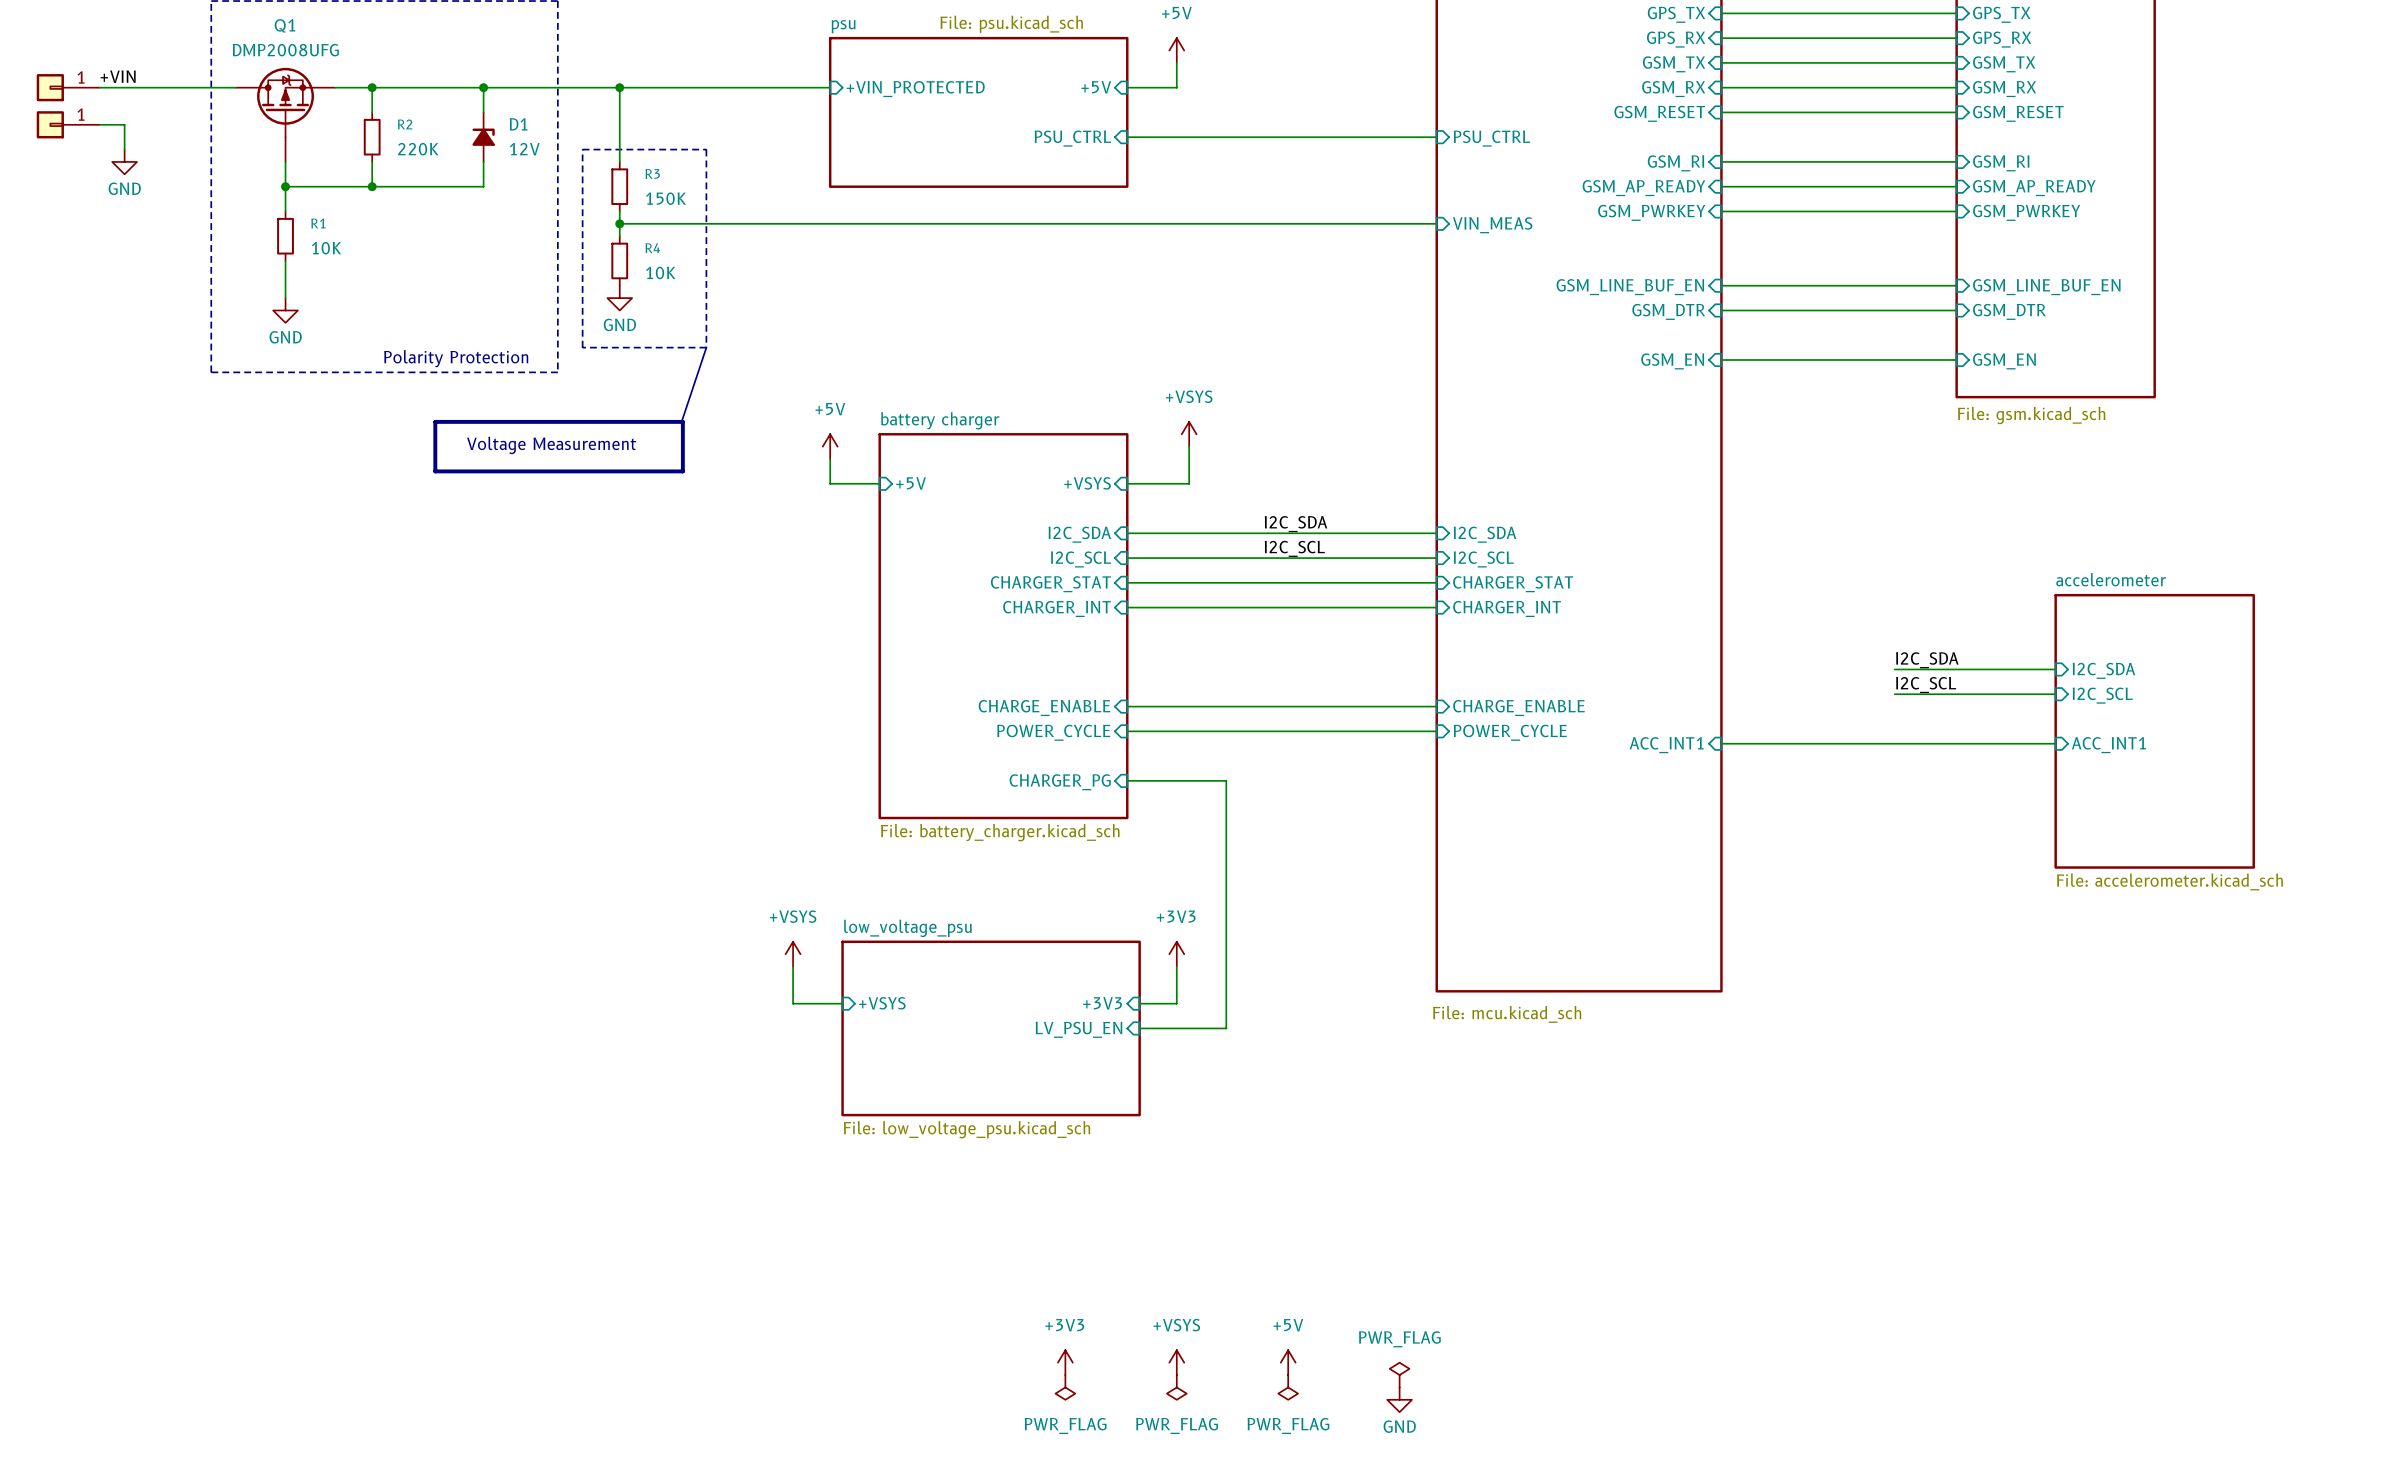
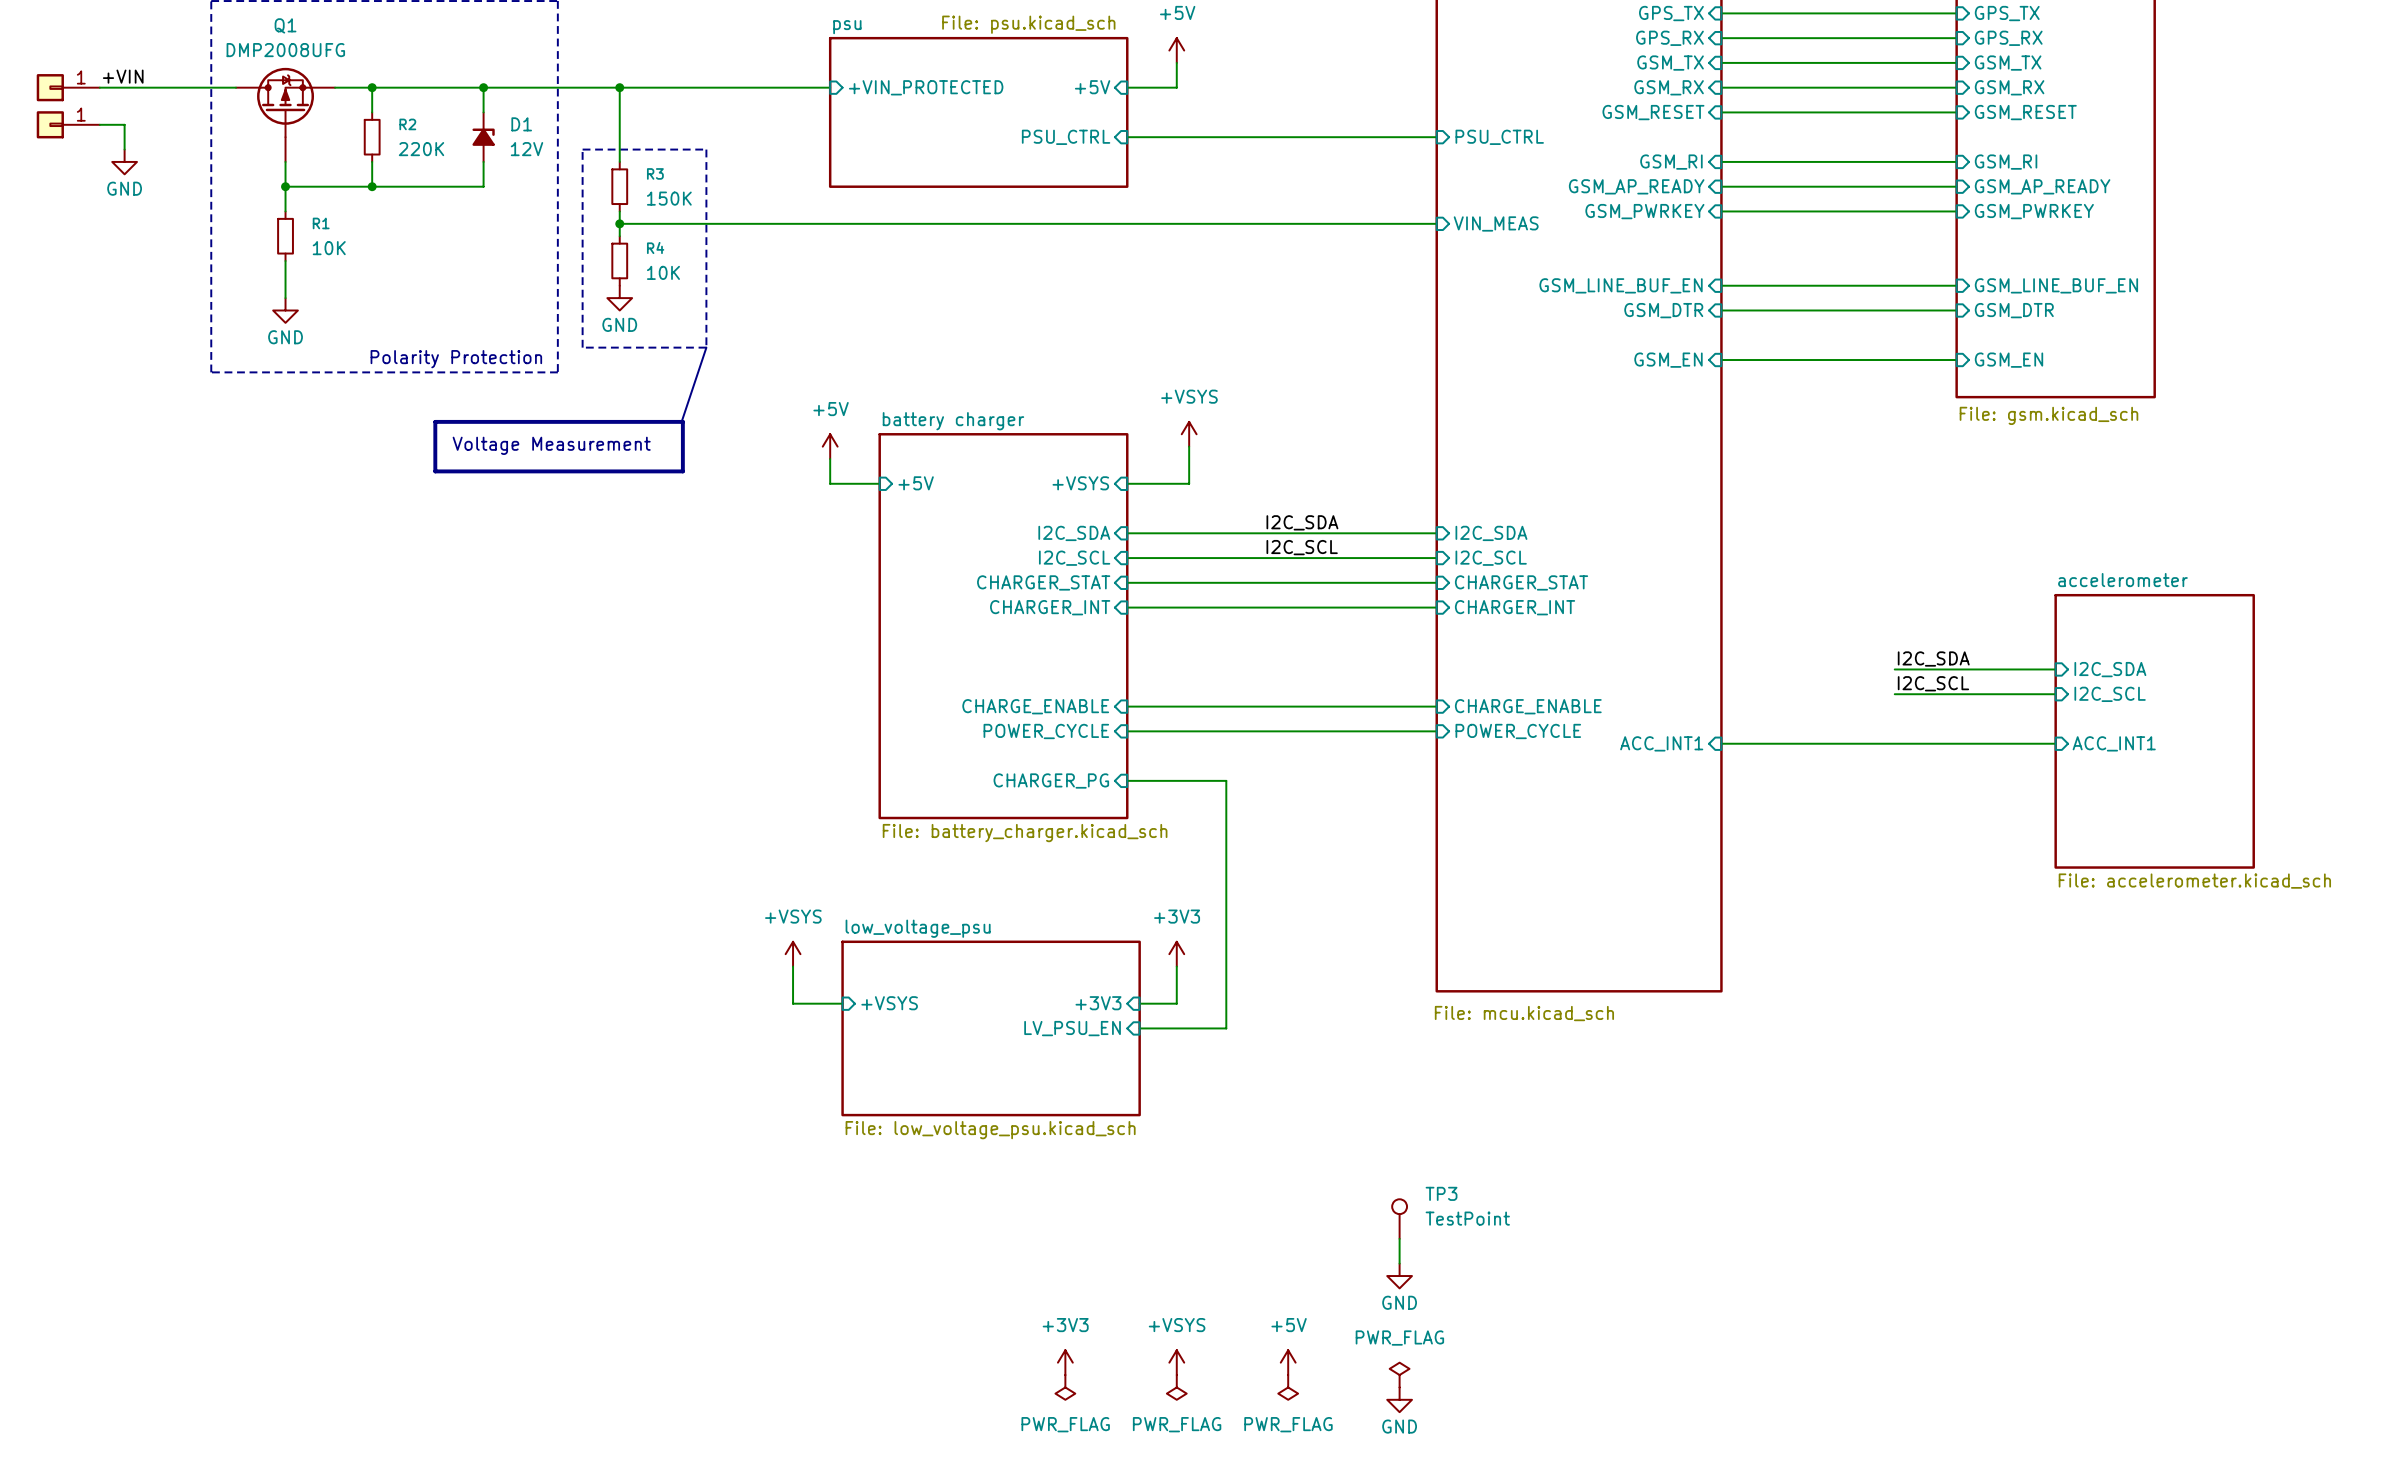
TP3: none -> TestPoint (1399, 1219)
wire: none -> (1399, 1238) (1399, 1263)
power symbol: none -> GND (1399, 1276)

